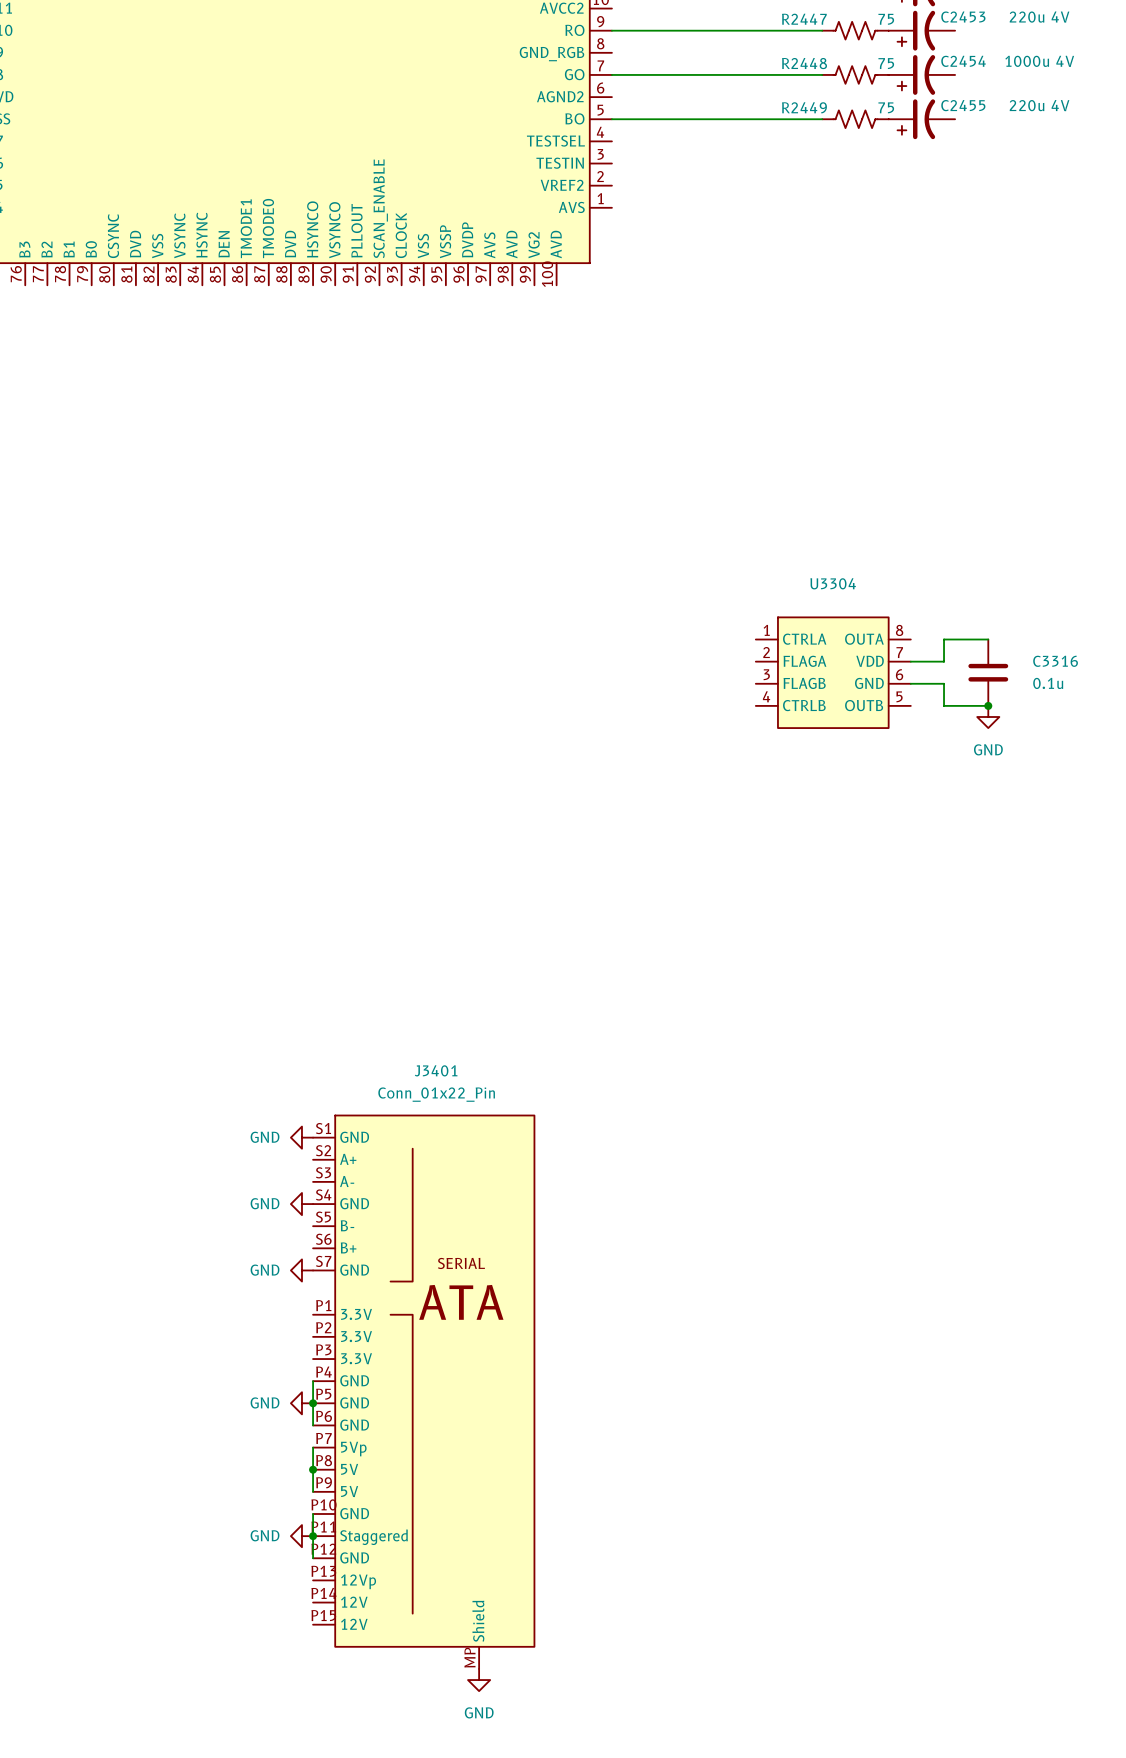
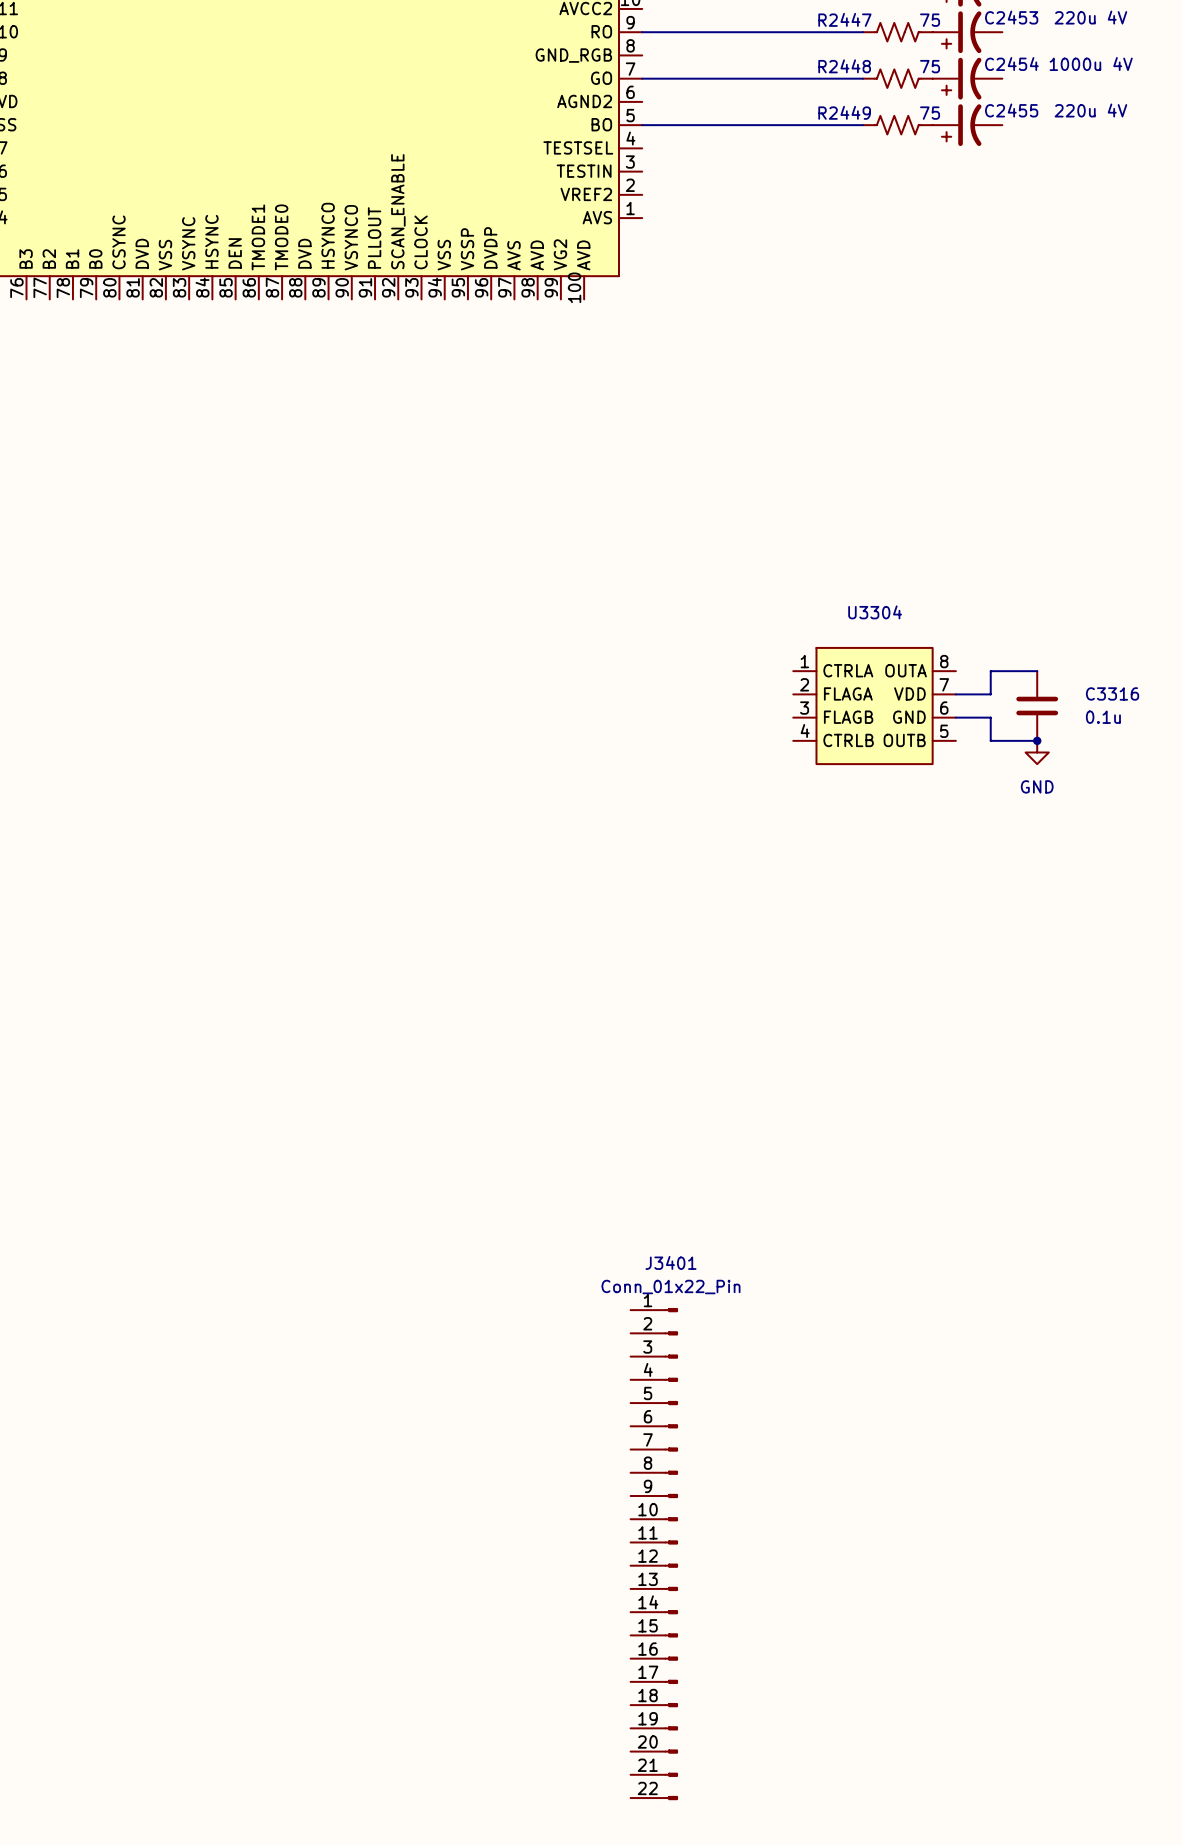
J3401 name position: J3401 (436, 1070) -> J3401 (670, 1262)
J3401 value position: Conn_01x22_Pin (436, 1094) -> Conn_01x22_Pin (670, 1287)
J3401 symbol: [313, 1115, 535, 1669] -> [630, 1308, 678, 1800]
power symbol: GND (301, 1137) -> none
power symbol: GND (301, 1204) -> none
power symbol: GND (301, 1270) -> none
wire: (313, 1381) (313, 1425) -> none
power symbol: GND (301, 1403) -> none
junction: (313, 1403) -> none
wire: (313, 1447) (313, 1491) -> none
junction: (313, 1469) -> none
wire: (313, 1513) (313, 1558) -> none
power symbol: GND (301, 1536) -> none
junction: (313, 1536) -> none
power symbol: GND (479, 1680) -> none

